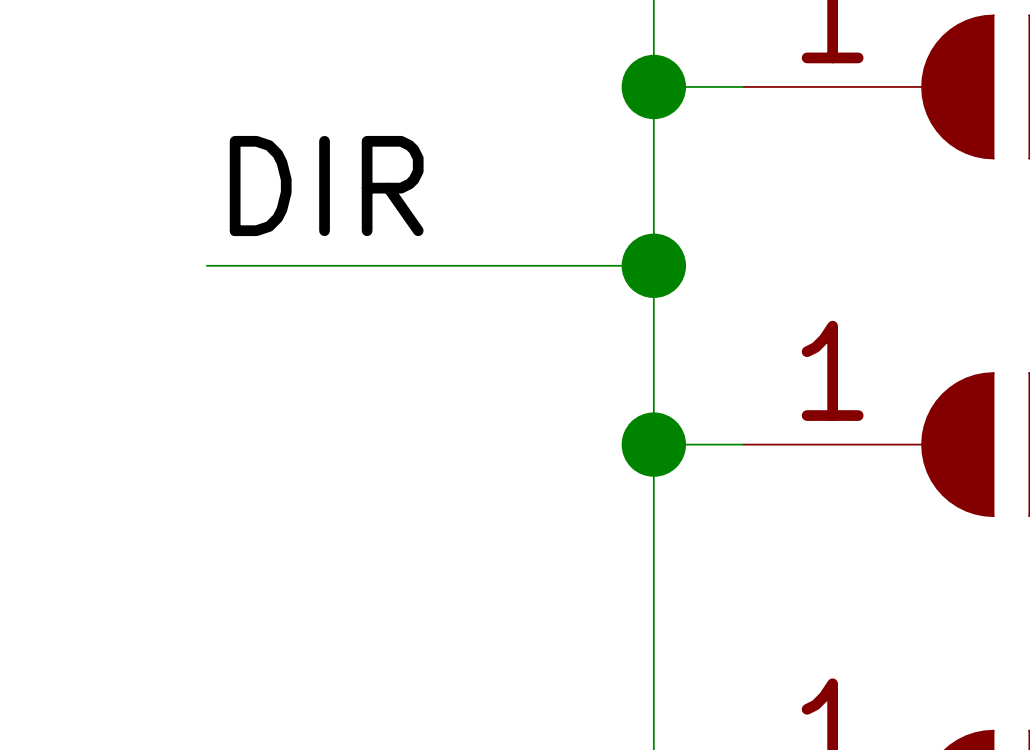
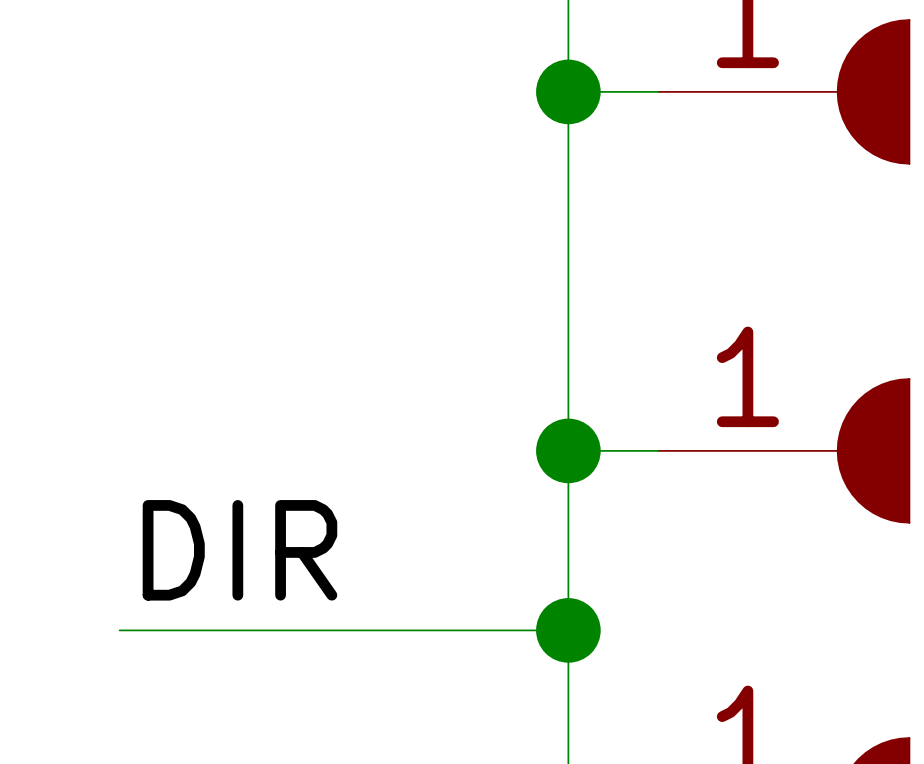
label position: DIR (326, 186) -> DIR (239, 550)
wire: (206, 265) (653, 265) -> (119, 630) (568, 630)
junction position: (653, 265) -> (568, 630)

